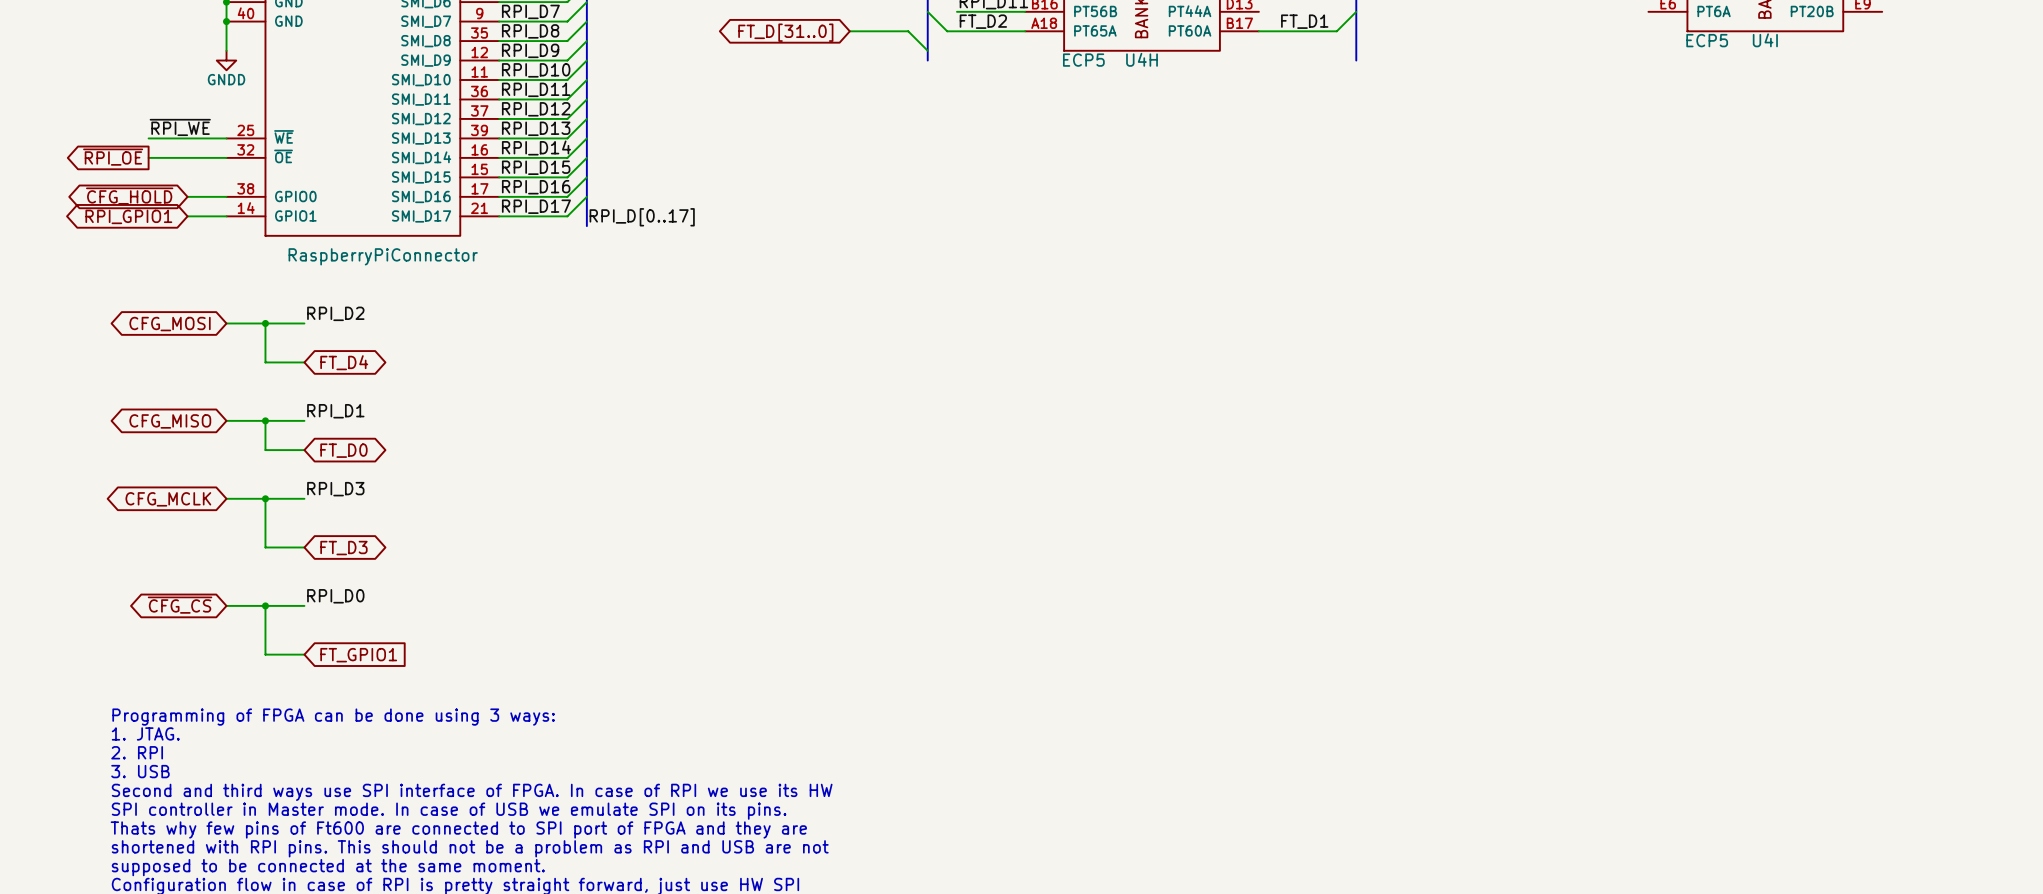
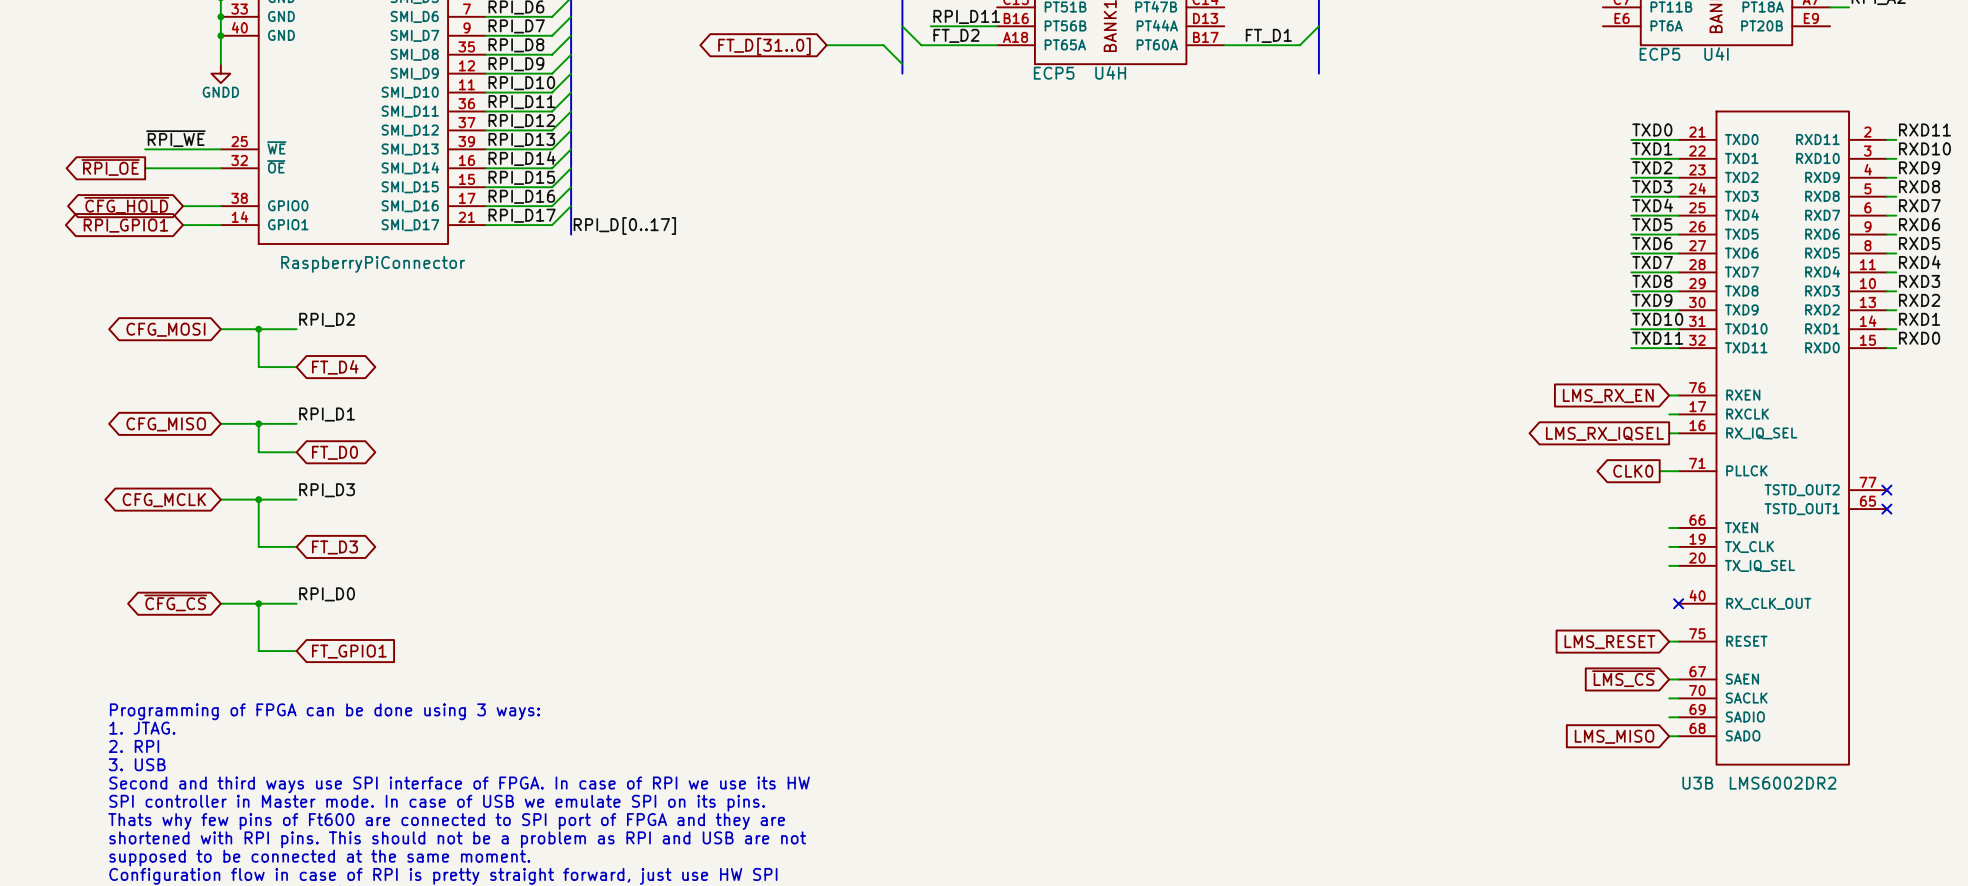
label: none -> TXD0 (1652, 129)
label: none -> RXD11 (1924, 129)
wire: none -> (1631, 139) (1678, 139)
wire: none -> (1886, 139) (1896, 139)
label: none -> TXD1 (1652, 148)
label: none -> RXD10 (1924, 148)
wire: none -> (1631, 158) (1678, 158)
wire: none -> (1886, 158) (1896, 158)
label: none -> TXD2 (1652, 167)
label: none -> RXD9 (1919, 167)
wire: none -> (1631, 177) (1678, 177)
wire: none -> (1886, 177) (1896, 177)
label: none -> TXD3 (1652, 186)
label: none -> RXD8 (1919, 186)
wire: none -> (1631, 196) (1678, 196)
wire: none -> (1886, 196) (1896, 196)
label: none -> TXD4 (1652, 205)
label: none -> RXD7 (1919, 205)
wire: none -> (1631, 215) (1678, 215)
wire: none -> (1886, 215) (1896, 215)
label: none -> TXD5 (1652, 224)
label: none -> RXD6 (1919, 224)
wire: none -> (1631, 234) (1678, 234)
wire: none -> (1886, 234) (1896, 234)
label: none -> TXD6 (1652, 243)
label: none -> RXD5 (1919, 243)
wire: none -> (1631, 253) (1678, 253)
wire: none -> (1886, 253) (1896, 253)
label: none -> TXD7 (1652, 262)
label: none -> RXD4 (1919, 262)
wire: none -> (1631, 272) (1678, 272)
wire: none -> (1886, 272) (1896, 272)
label: none -> TXD8 (1652, 281)
label: none -> RXD3 (1919, 281)
wire: none -> (1631, 291) (1678, 291)
wire: none -> (1886, 291) (1896, 291)
label: none -> TXD9 (1652, 300)
label: none -> RXD2 (1919, 300)
wire: none -> (1631, 310) (1678, 310)
wire: none -> (1886, 310) (1896, 310)
label: none -> TXD10 (1657, 319)
label: none -> RXD1 (1919, 319)
wire: none -> (1631, 329) (1678, 329)
wire: none -> (1886, 329) (1896, 329)
label: none -> TXD11 (1657, 338)
label: none -> RXD0 (1919, 338)
wire: none -> (1631, 348) (1678, 348)
wire: none -> (1886, 348) (1896, 348)
wire: none -> (1669, 395) (1678, 395)
global label: none -> LMS_RX_EN (1608, 396)
wire: none -> (1669, 414) (1678, 414)
wire: none -> (1669, 433) (1678, 433)
global label: none -> LMS_RX_IQSEL (1604, 433)
U3B: none -> (1782, 438)
global label: none -> CLK0 (1633, 471)
wire: none -> (1659, 471) (1678, 471)
no-connect mark: none -> (1886, 490)
no-connect mark: none -> (1886, 509)
wire: none -> (1669, 528) (1678, 528)
wire: none -> (1669, 546) (1678, 546)
wire: none -> (1669, 565) (1678, 565)
no-connect mark: none -> (1678, 603)
wire: none -> (1669, 641) (1678, 641)
global label: none -> LMS_RESET (1609, 642)
global label: none -> ~{LMS_CS} (1623, 678)
wire: none -> (1669, 679) (1678, 679)
wire: none -> (1669, 698) (1678, 698)
wire: none -> (1669, 717) (1678, 717)
global label: none -> LMS_MISO (1614, 736)
wire: none -> (1669, 736) (1678, 736)

